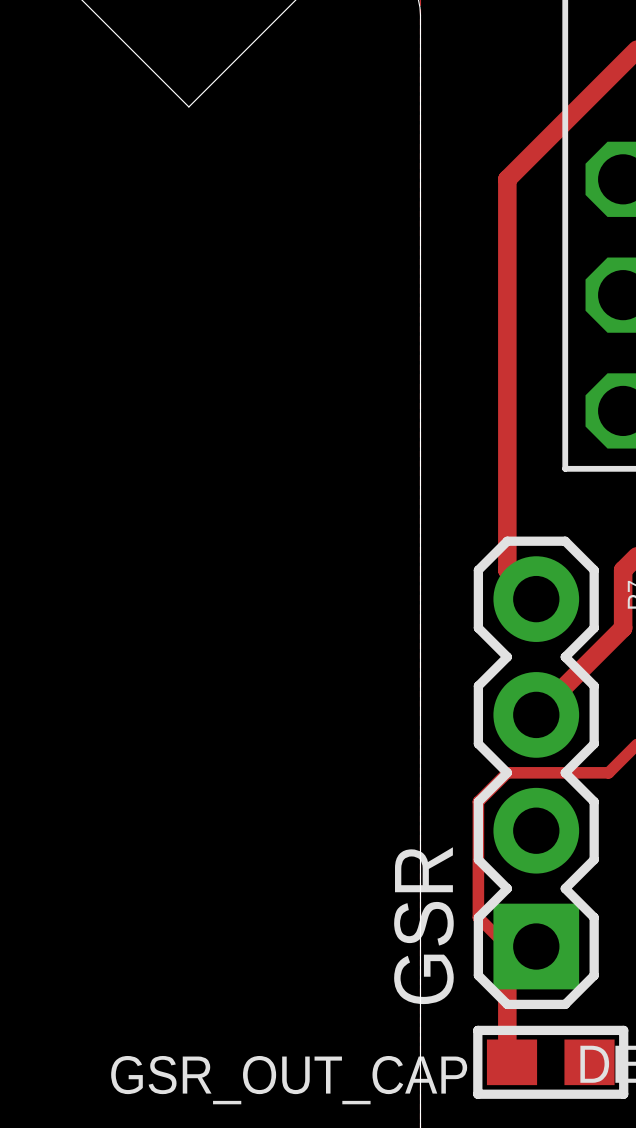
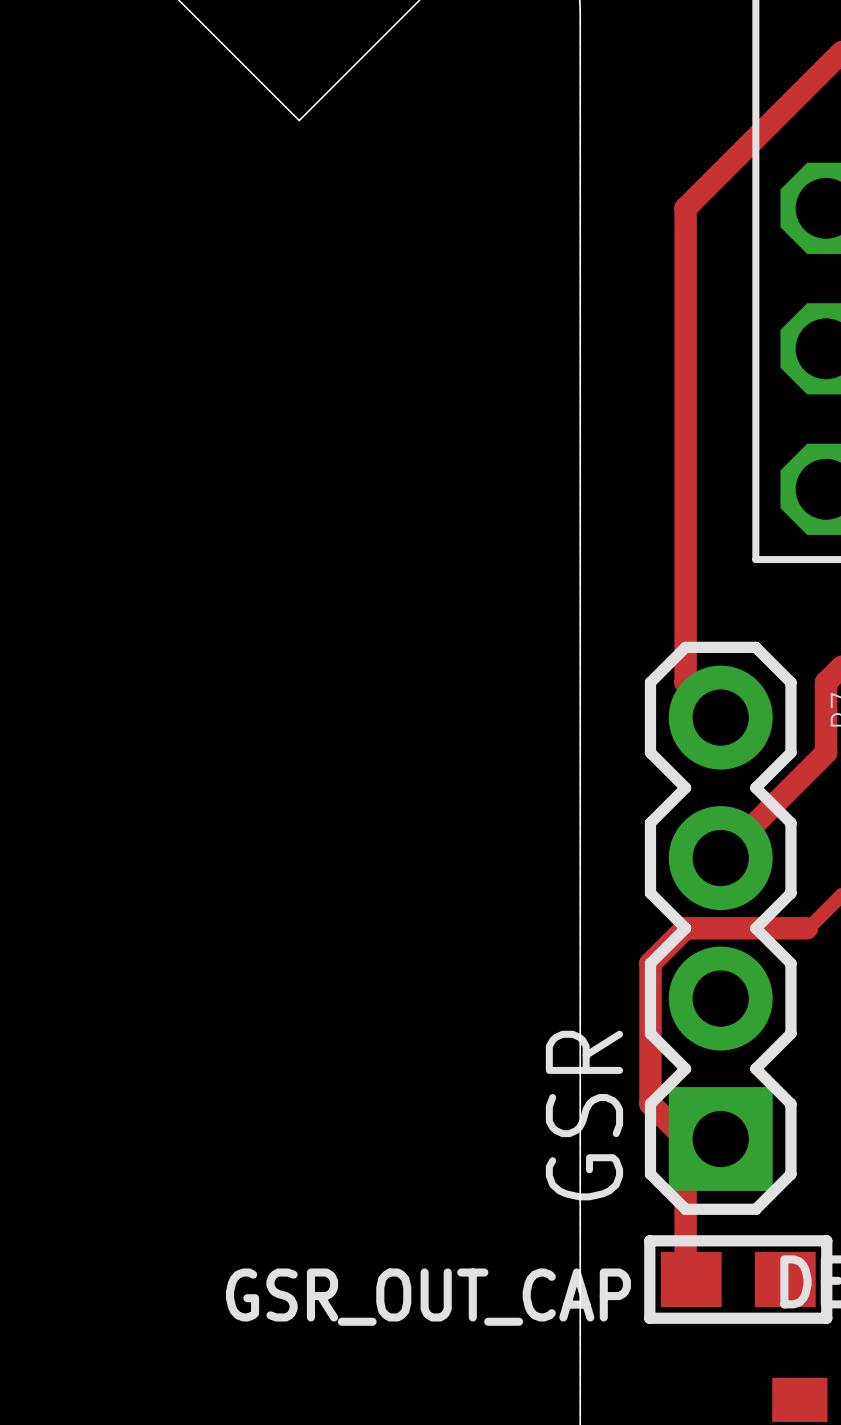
top track width: thin (607, 772) (507, 772) (478, 801) (478, 917) (507, 946) (536, 946) -> thick (807, 928) (685, 928) (650, 963) (650, 1103) (685, 1139) (720, 1139)

